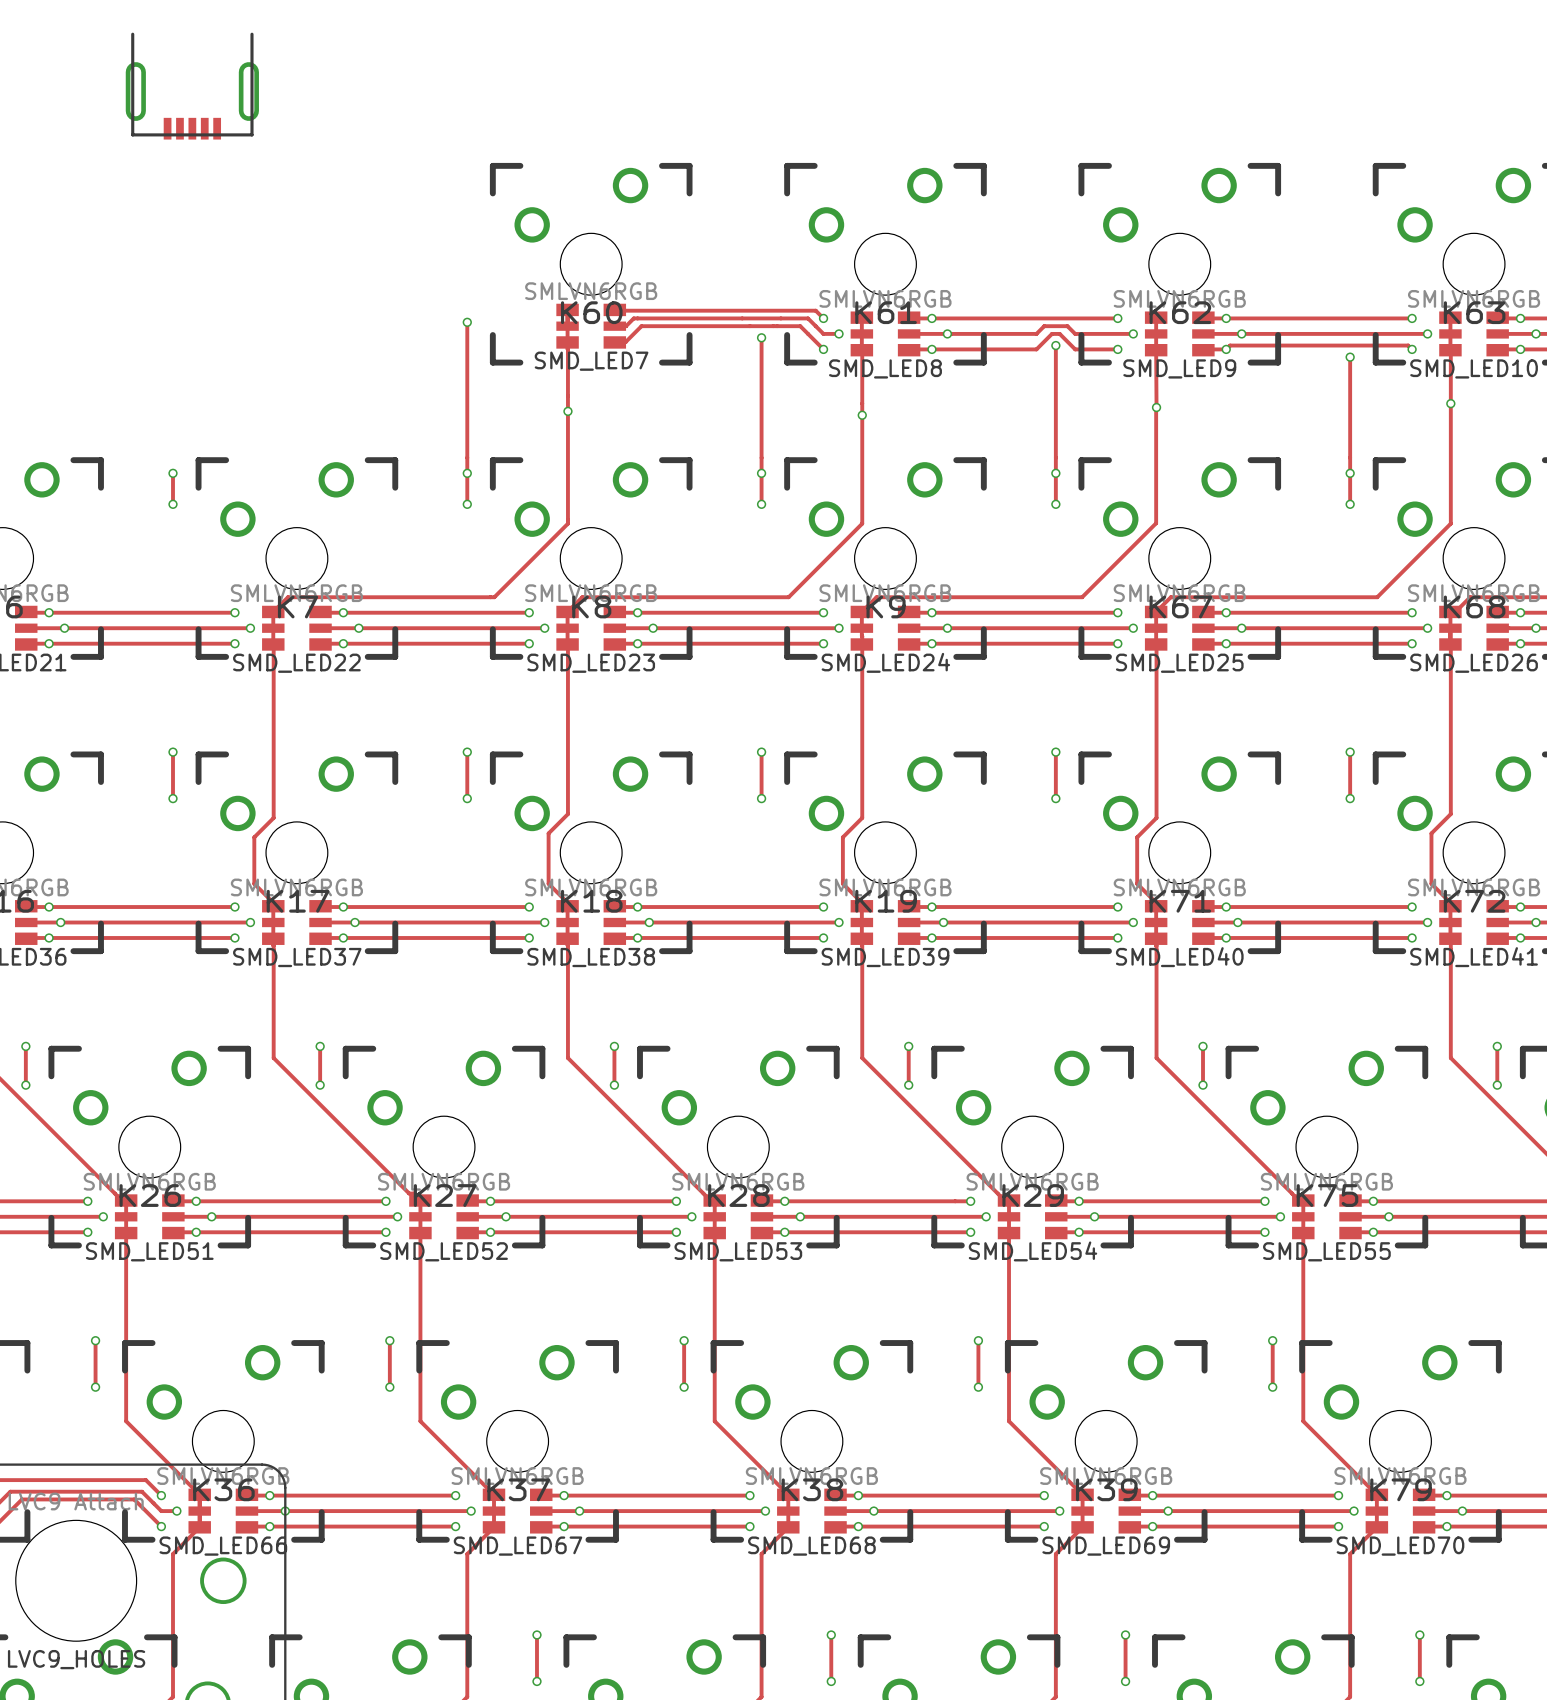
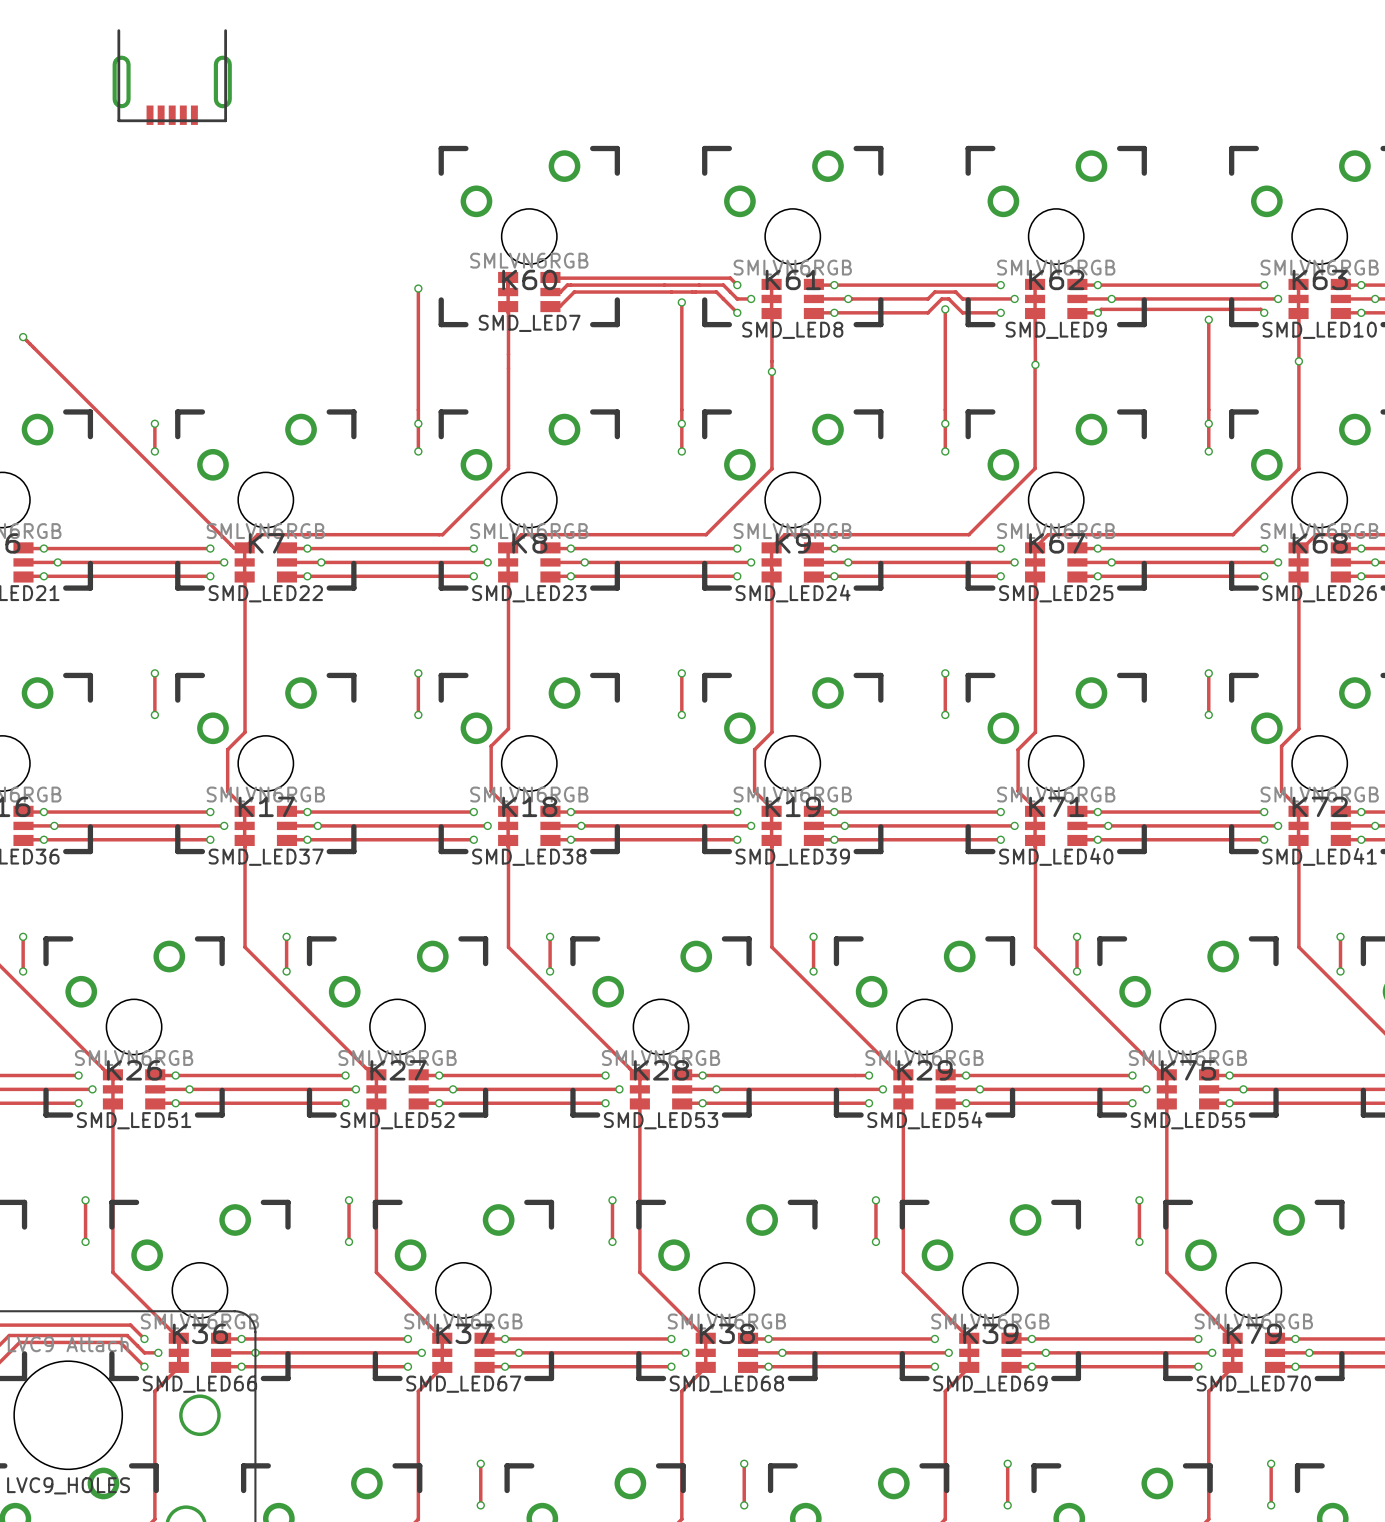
track: none -> (23, 337) (233, 547) (244, 547)
via: none -> (23, 337)
via: (567, 411) -> none

